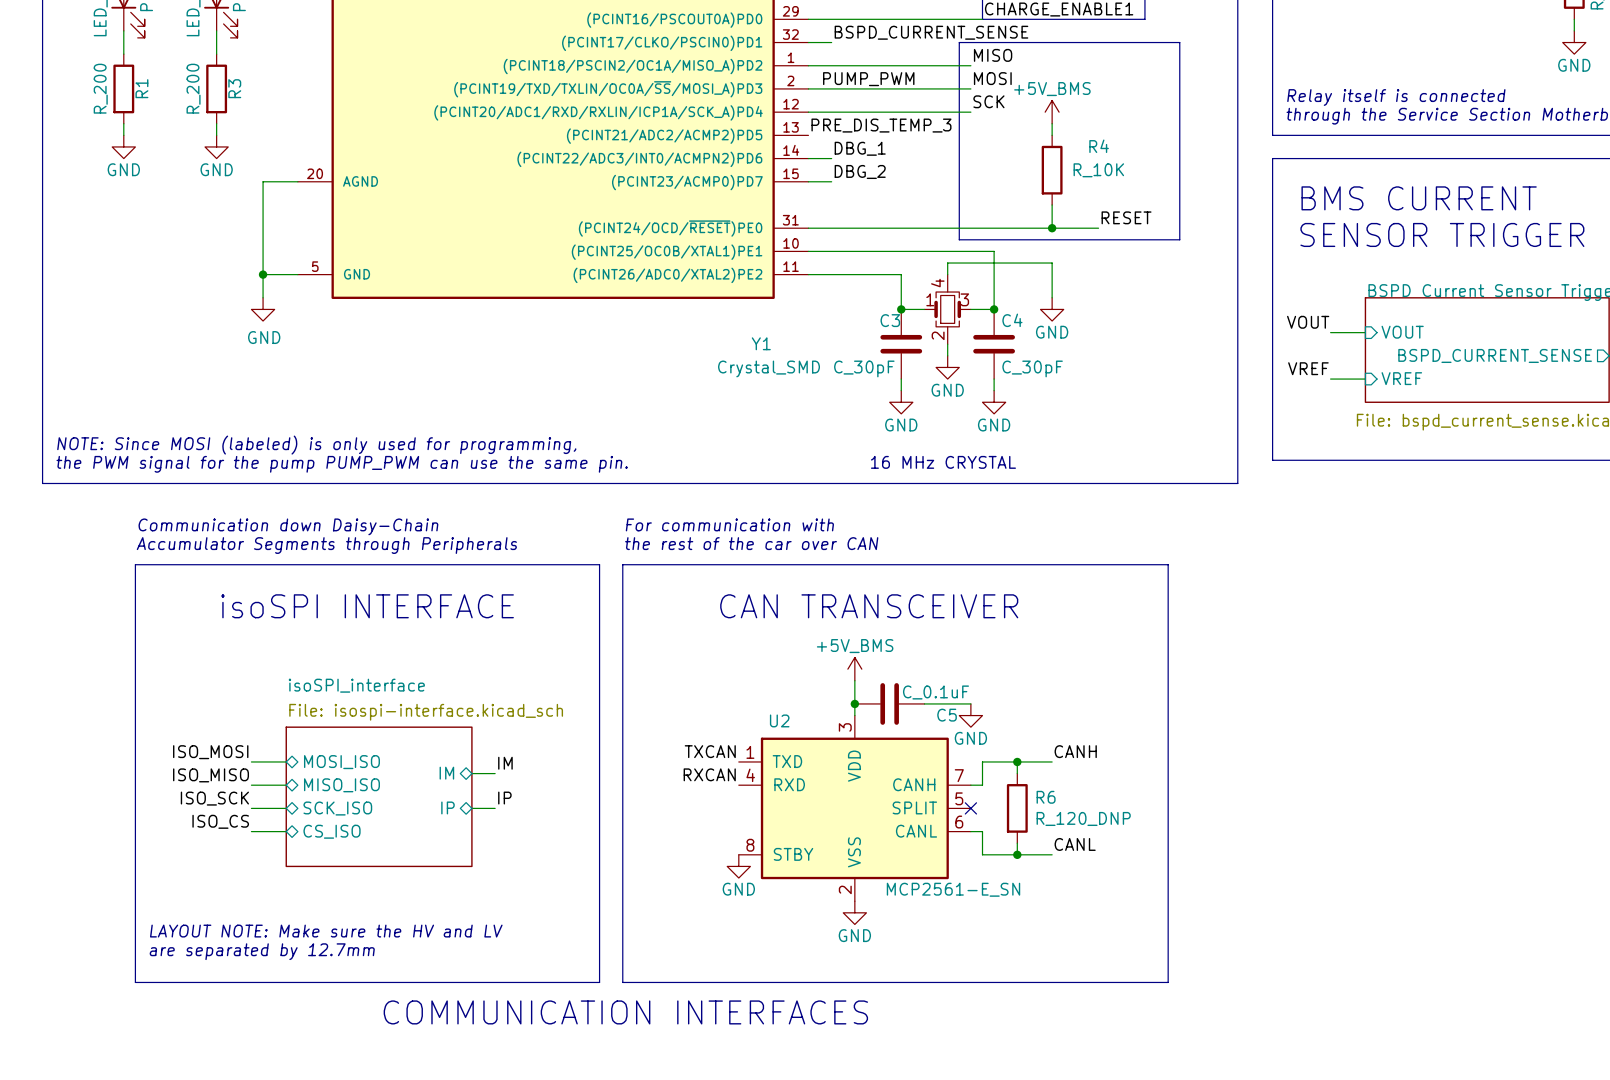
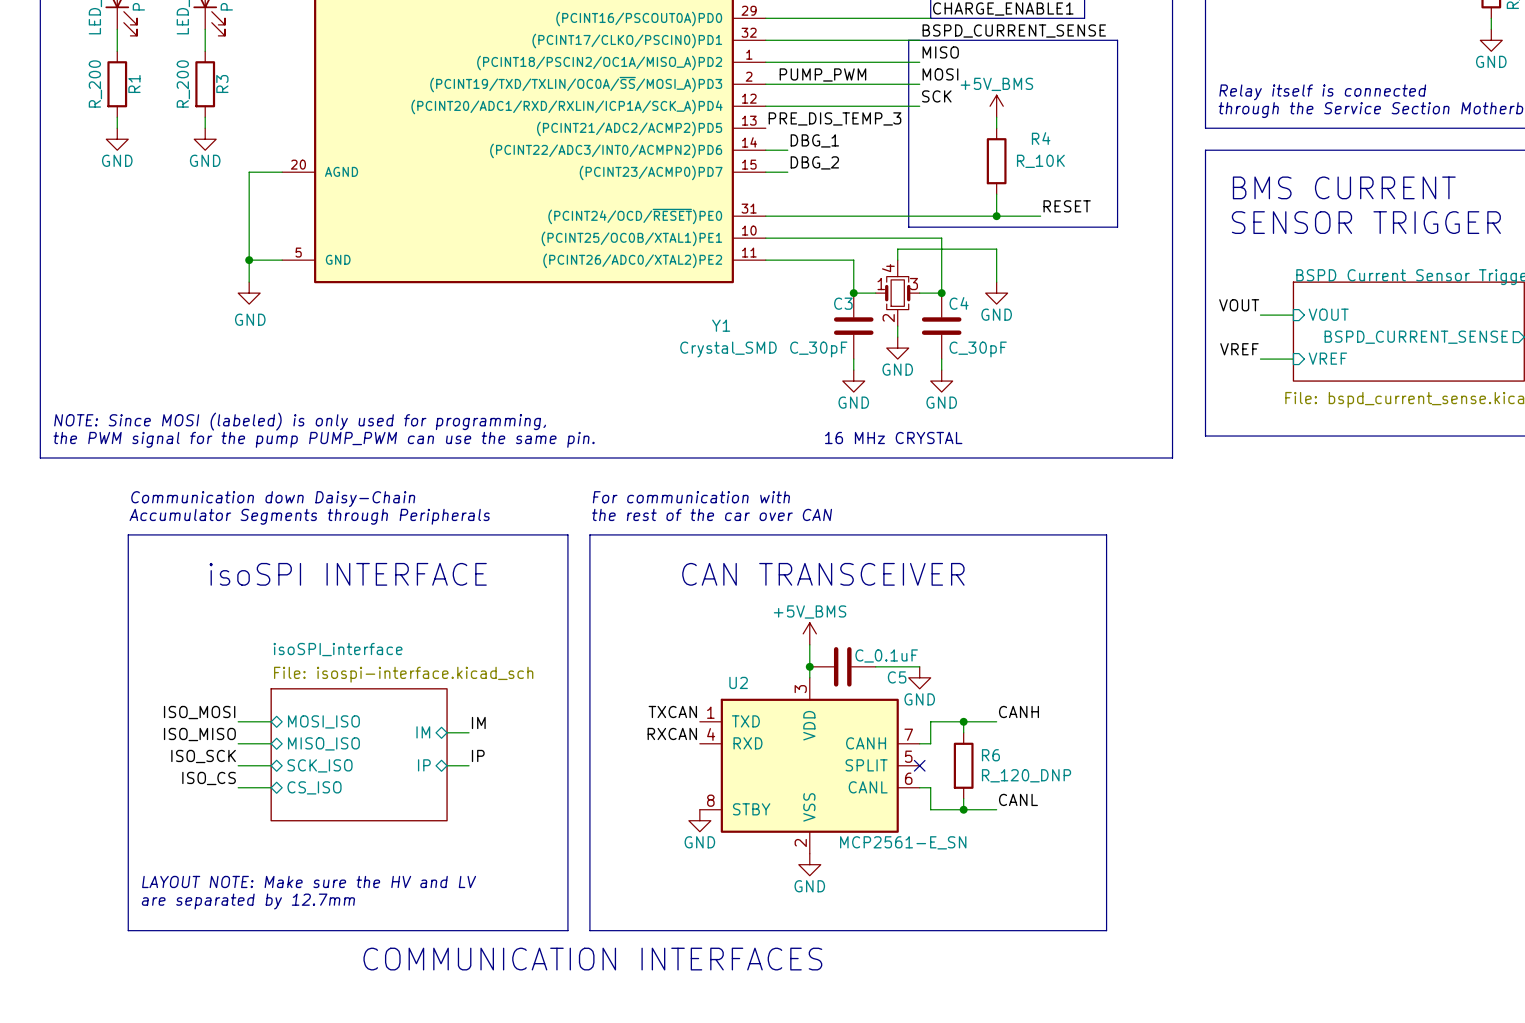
label position: BSPD_CURRENT_SENSE (931, 32) -> BSPD_CURRENT_SENSE (1014, 31)
wire: none -> (787, 40) (919, 40)

